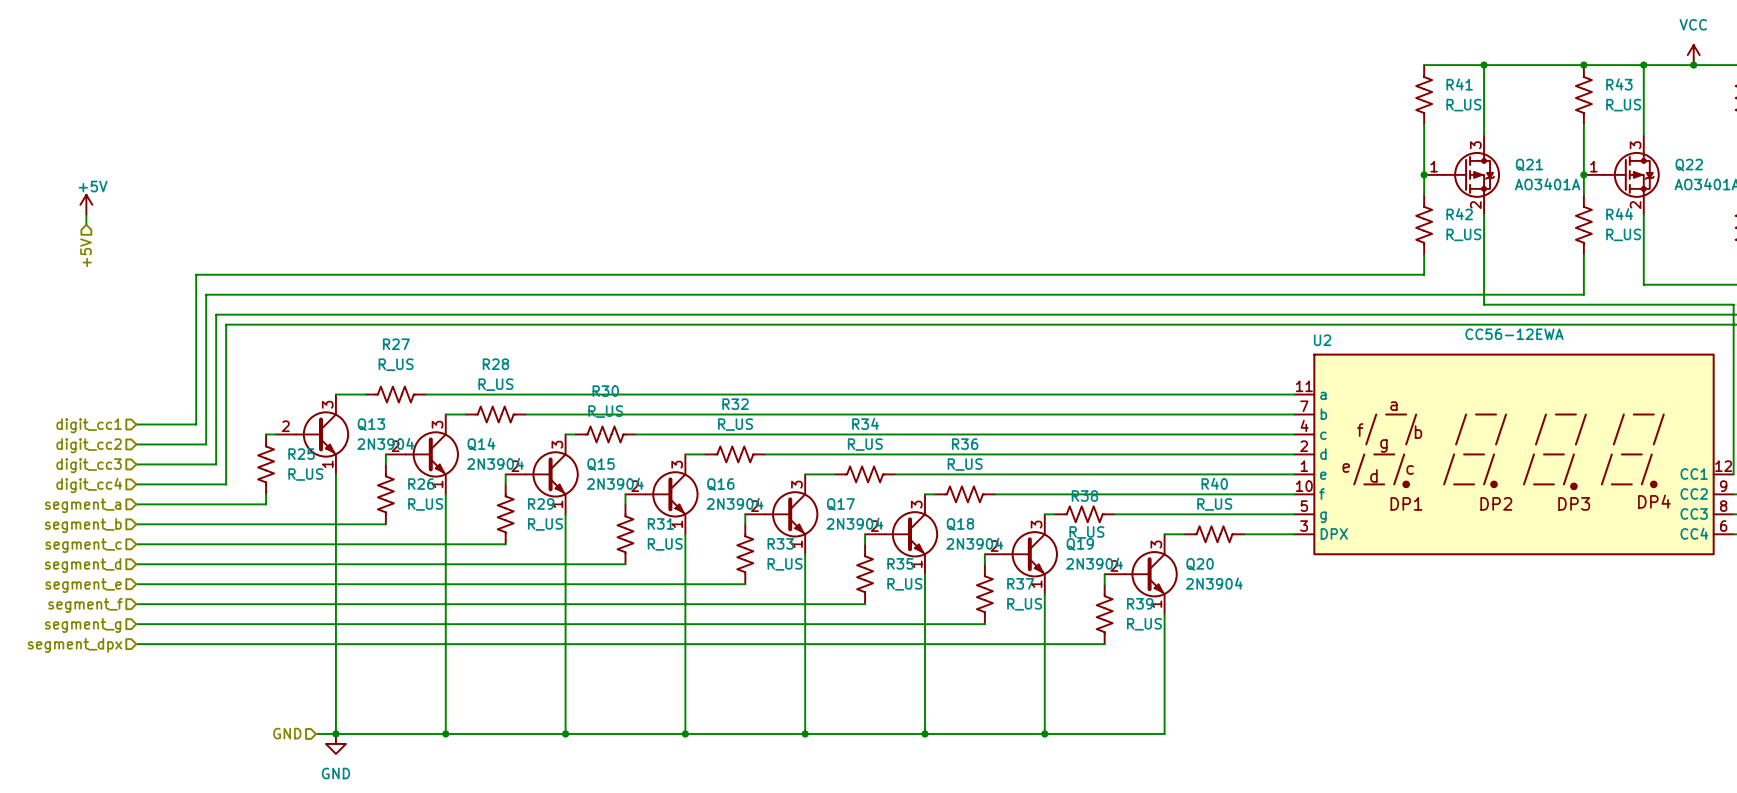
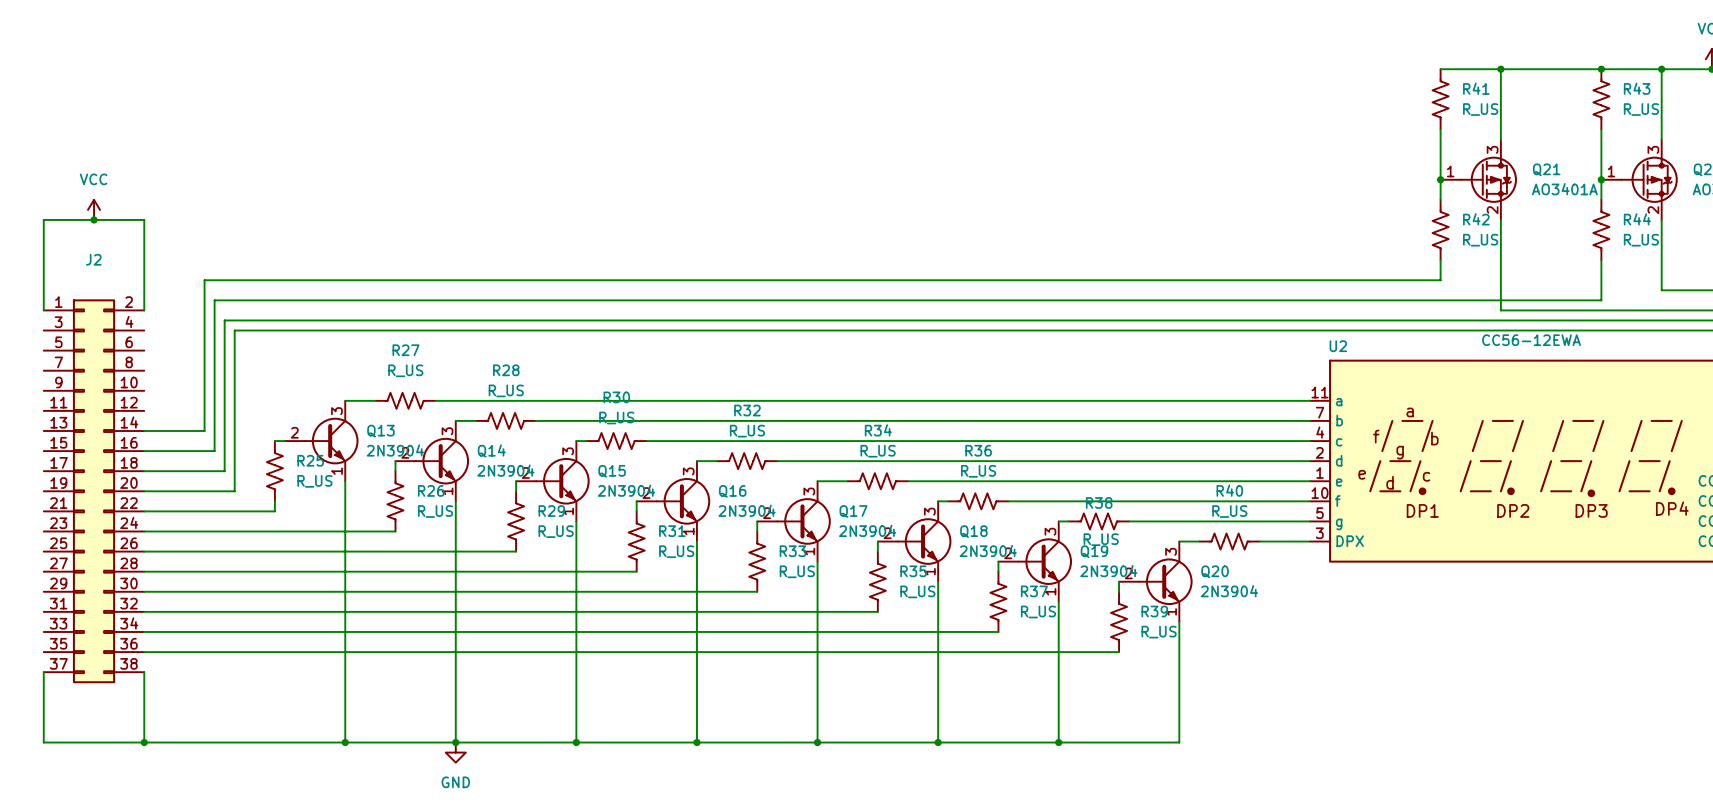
power symbol: +5V (86, 204) -> VCC (94, 209)
wire: (86, 214) (86, 224) -> none
junction: none -> (94, 219)
hierarchical label: +5V (86, 252) -> none
wire: none -> (43, 310) (43, 219) (144, 219) (144, 310)
hierarchical label: digit_cc1 (89, 425) -> none
hierarchical label: digit_cc2 (89, 445) -> none
hierarchical label: digit_cc3 (89, 465) -> none
J2: none -> (94, 491)
hierarchical label: digit_cc4 (89, 485) -> none
hierarchical label: segment_a (83, 505) -> none
hierarchical label: segment_b (83, 525) -> none
hierarchical label: segment_c (83, 545) -> none
hierarchical label: segment_d (83, 565) -> none
hierarchical label: segment_e (83, 585) -> none
hierarchical label: segment_f (85, 605) -> none
hierarchical label: segment_g (83, 625) -> none
hierarchical label: segment_dpx (75, 645) -> none
wire: none -> (43, 672) (43, 742) (325, 742)
wire: none -> (144, 672) (144, 742)
junction: none -> (144, 742)
hierarchical label: GND (287, 733) -> none
power symbol position: GND (335, 743) -> GND (455, 752)

